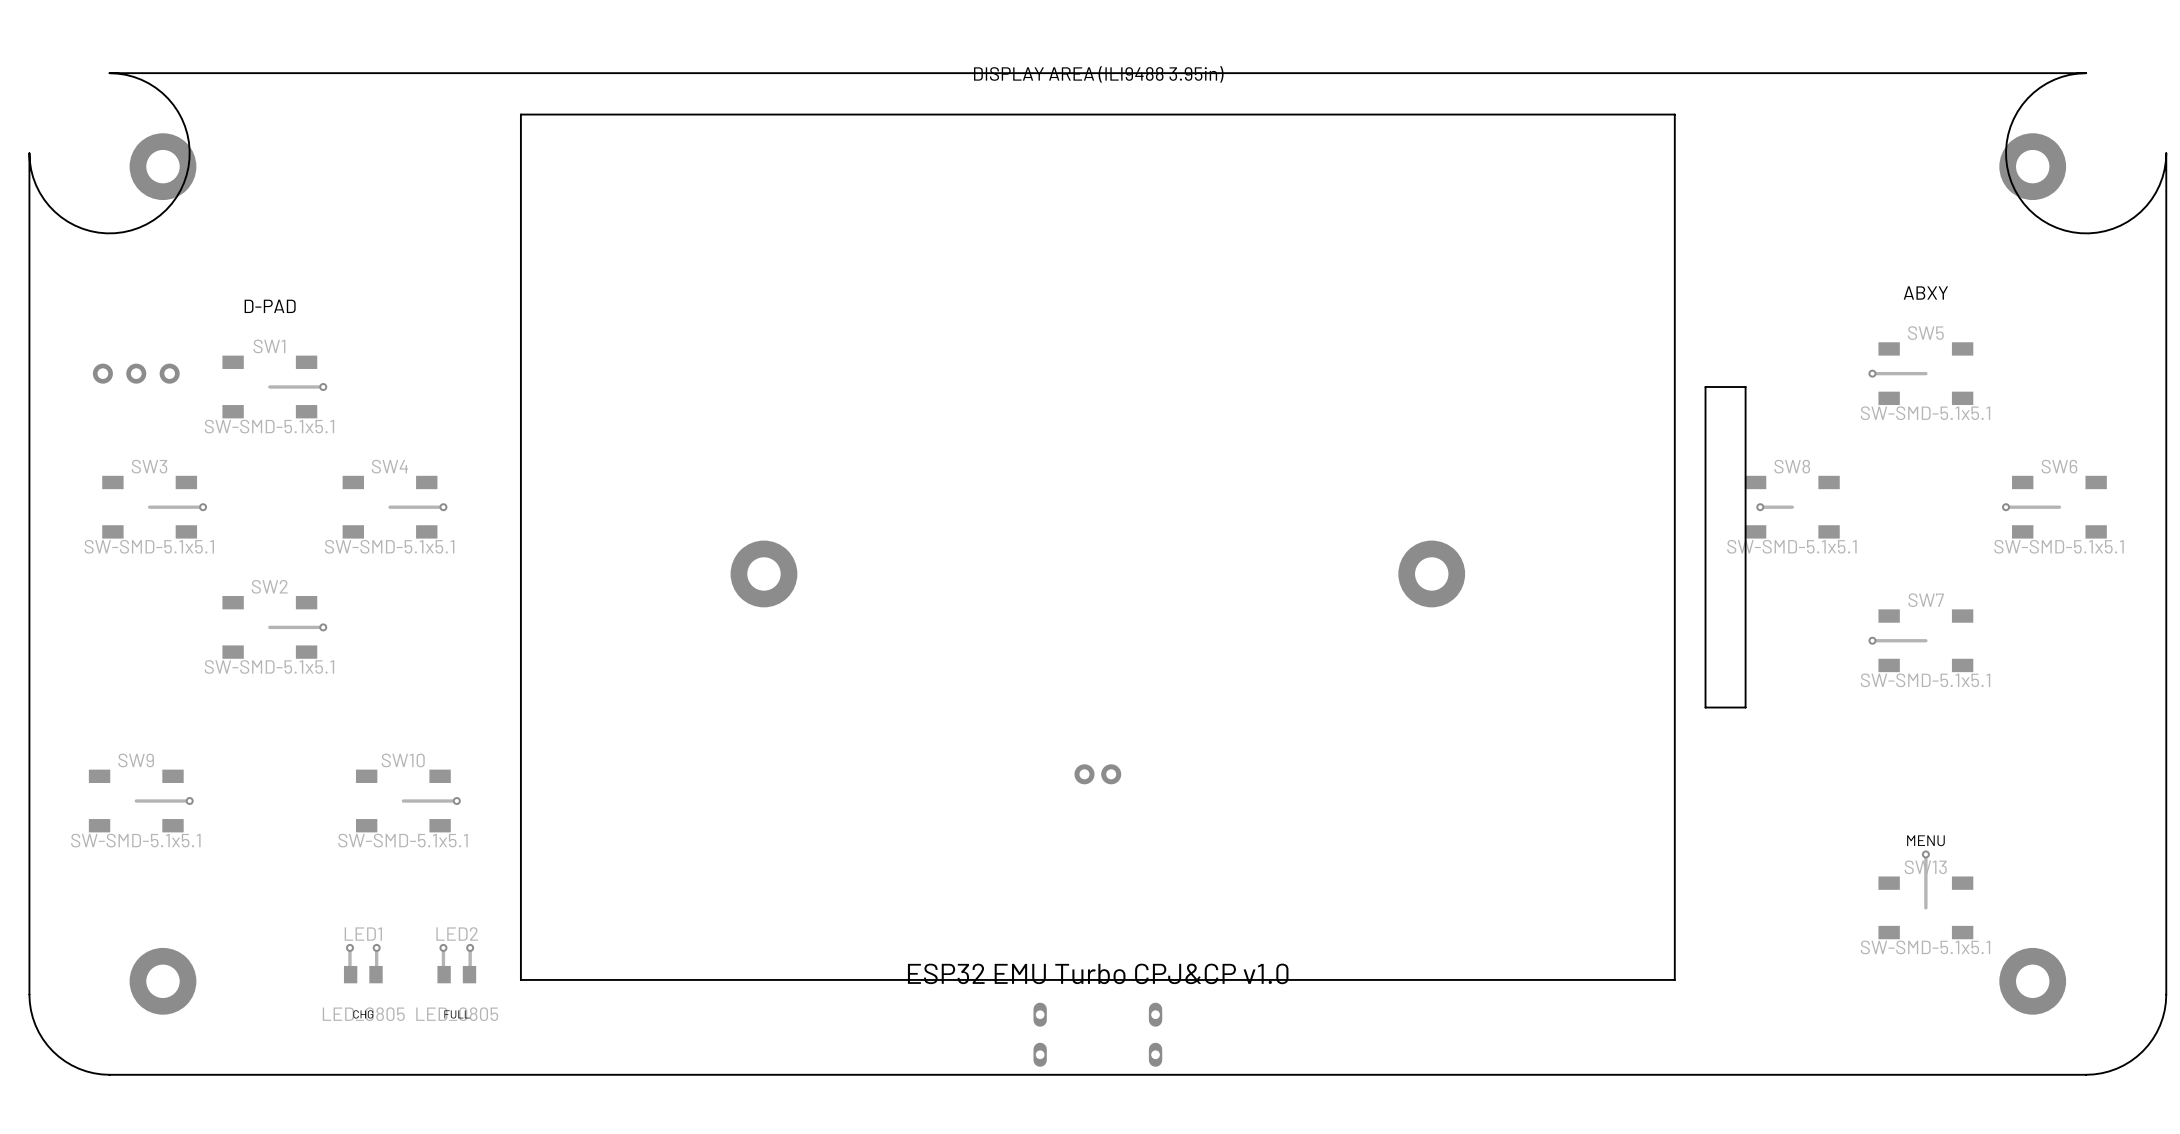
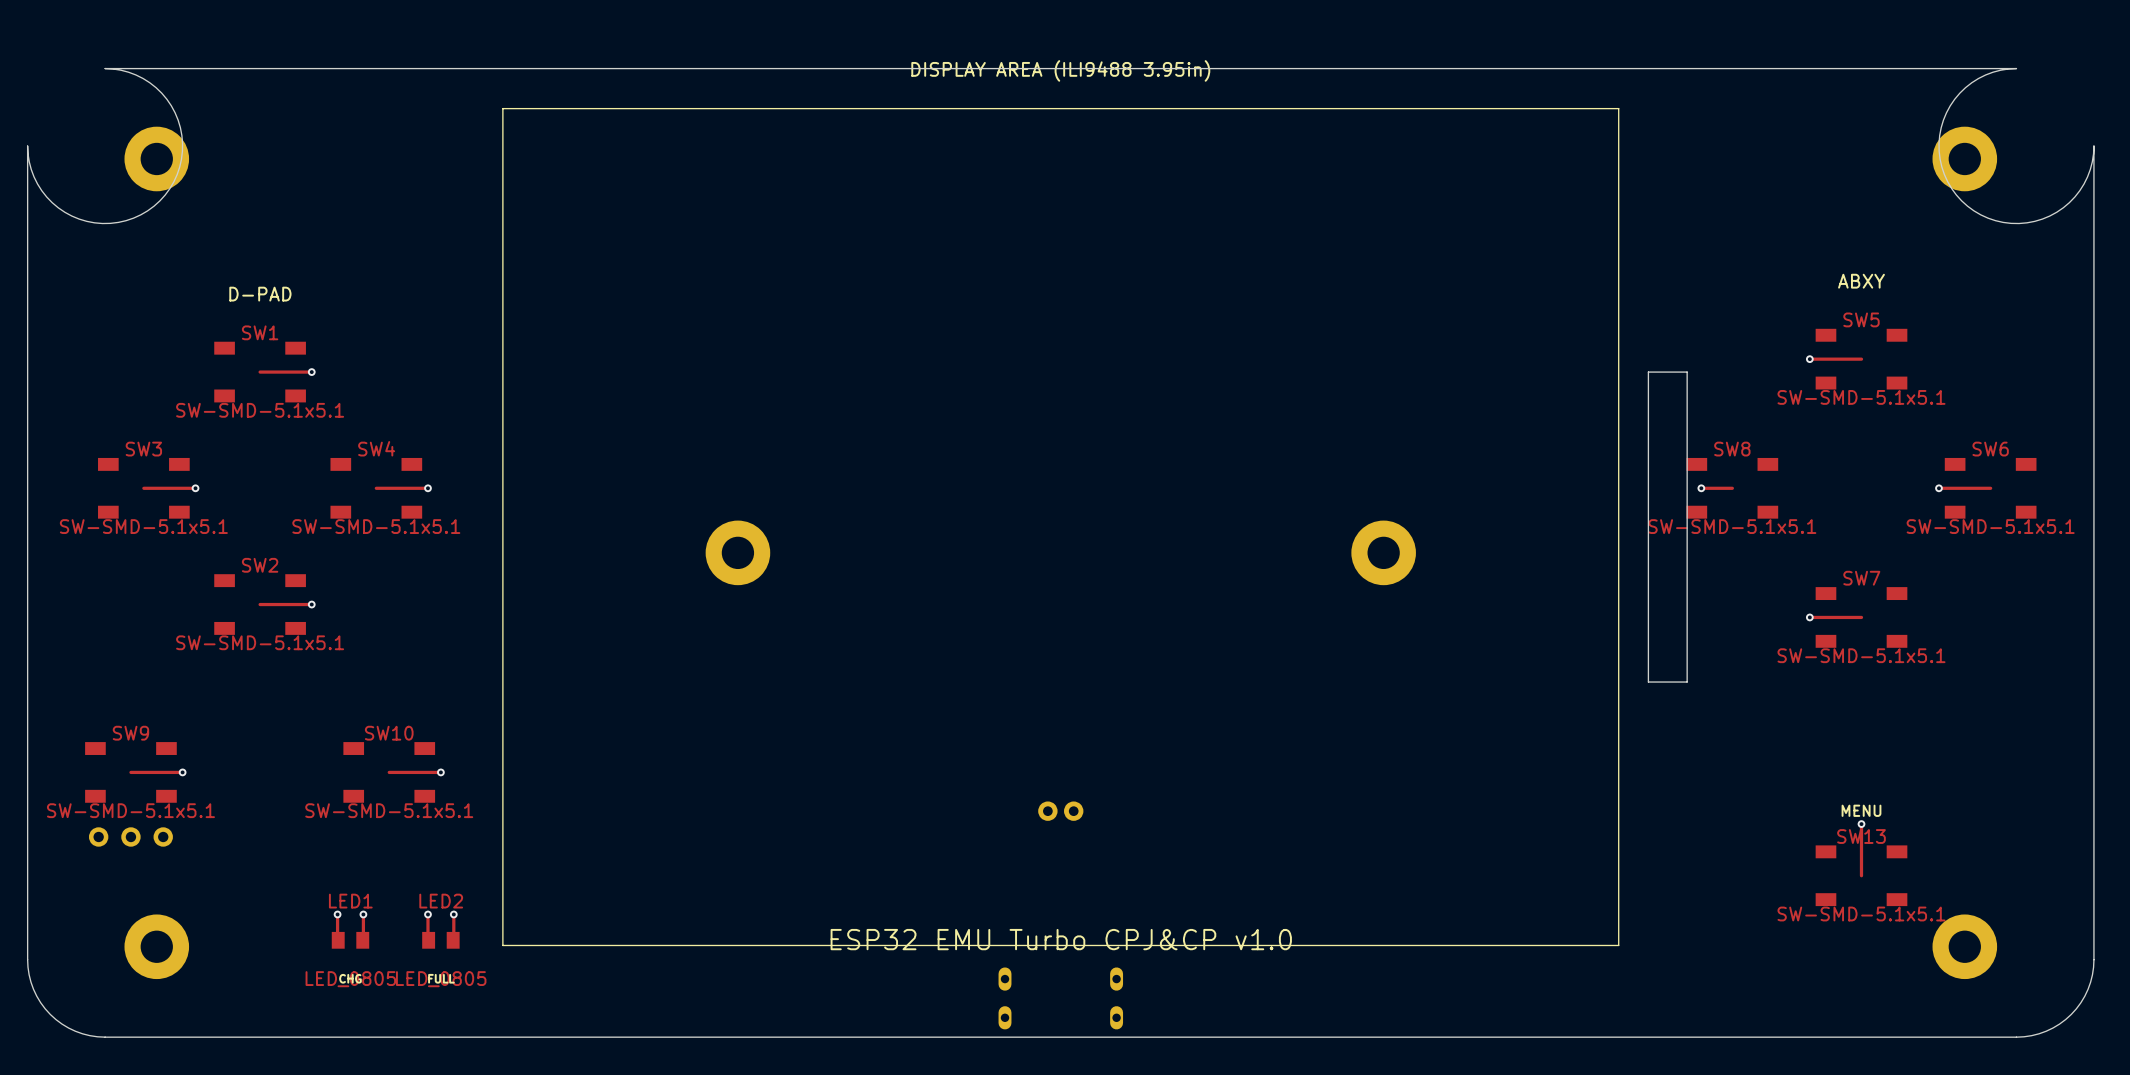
part: (136, 373) -> none
part position: (1097, 774) -> (1060, 811)
part: none -> (130, 836)

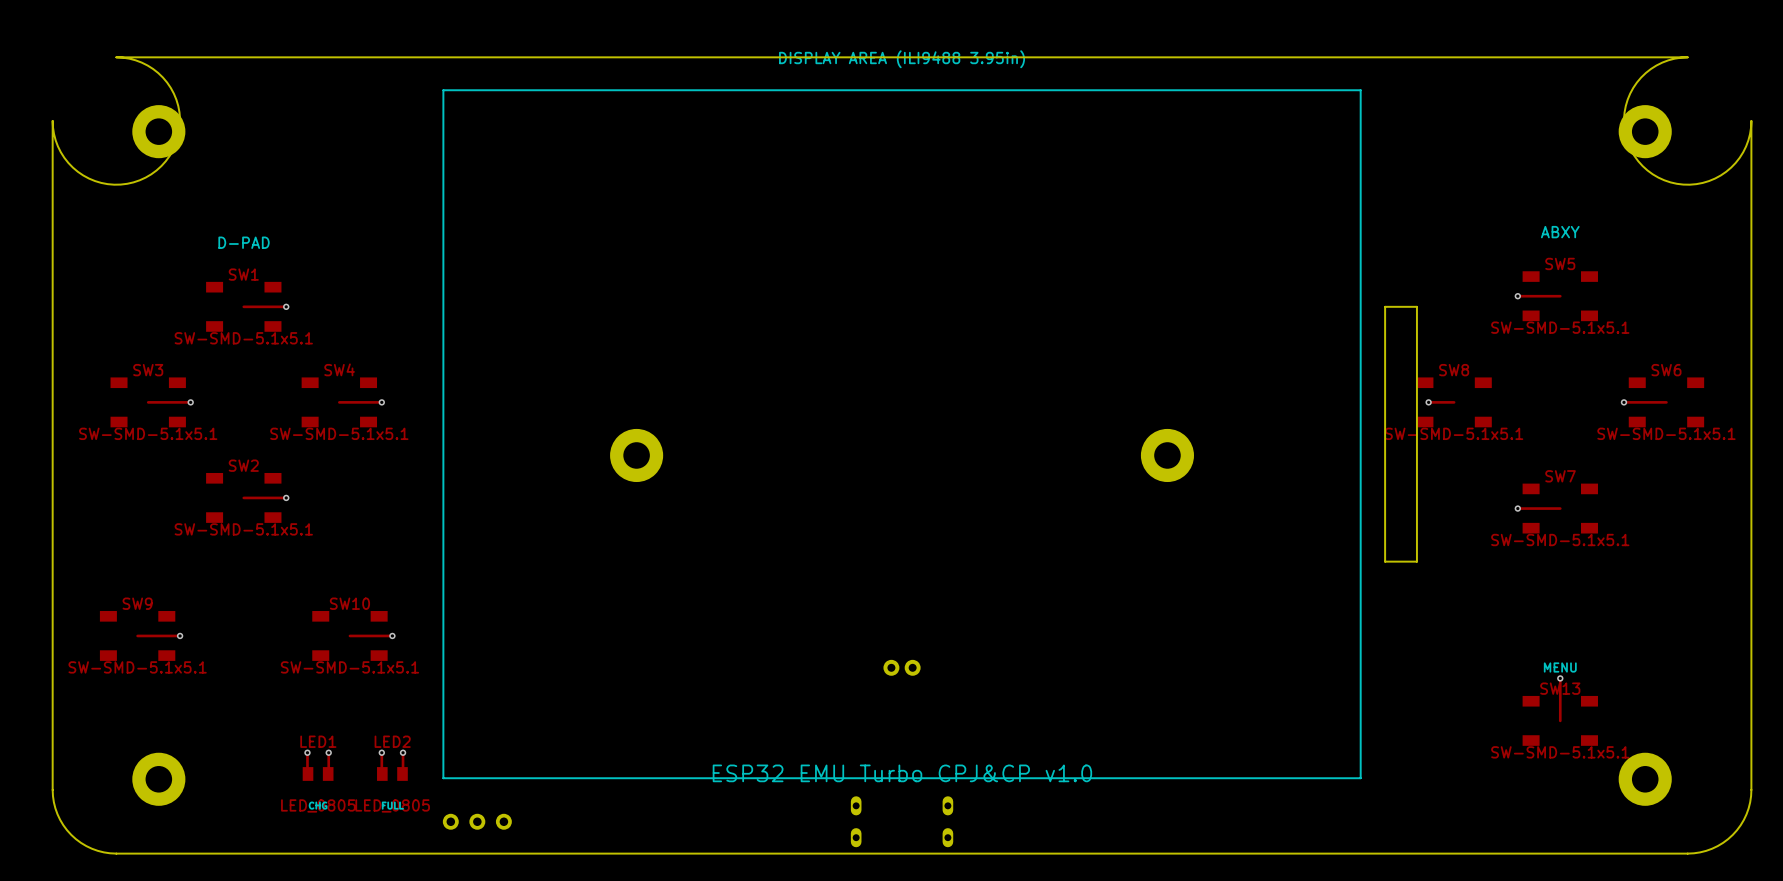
part: (130, 836) -> none
part: none -> (477, 821)

